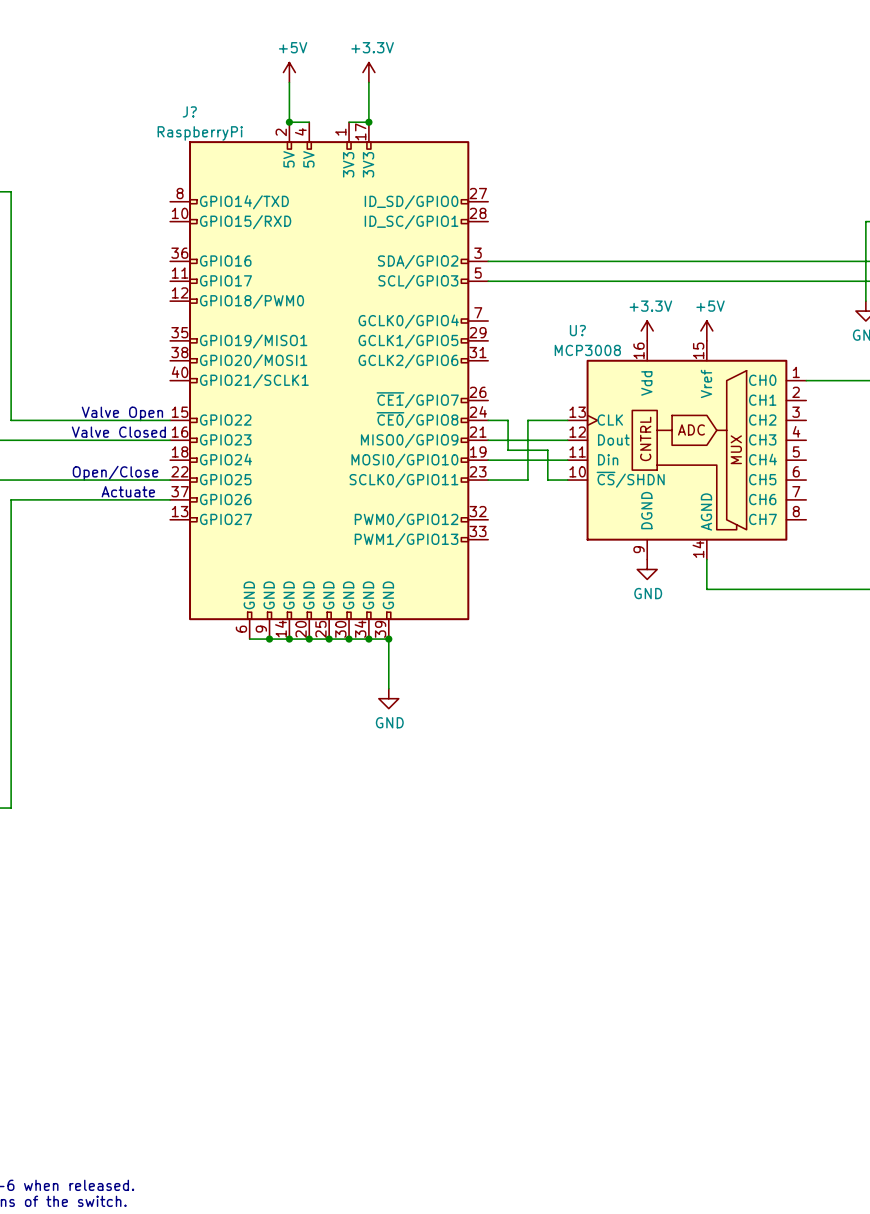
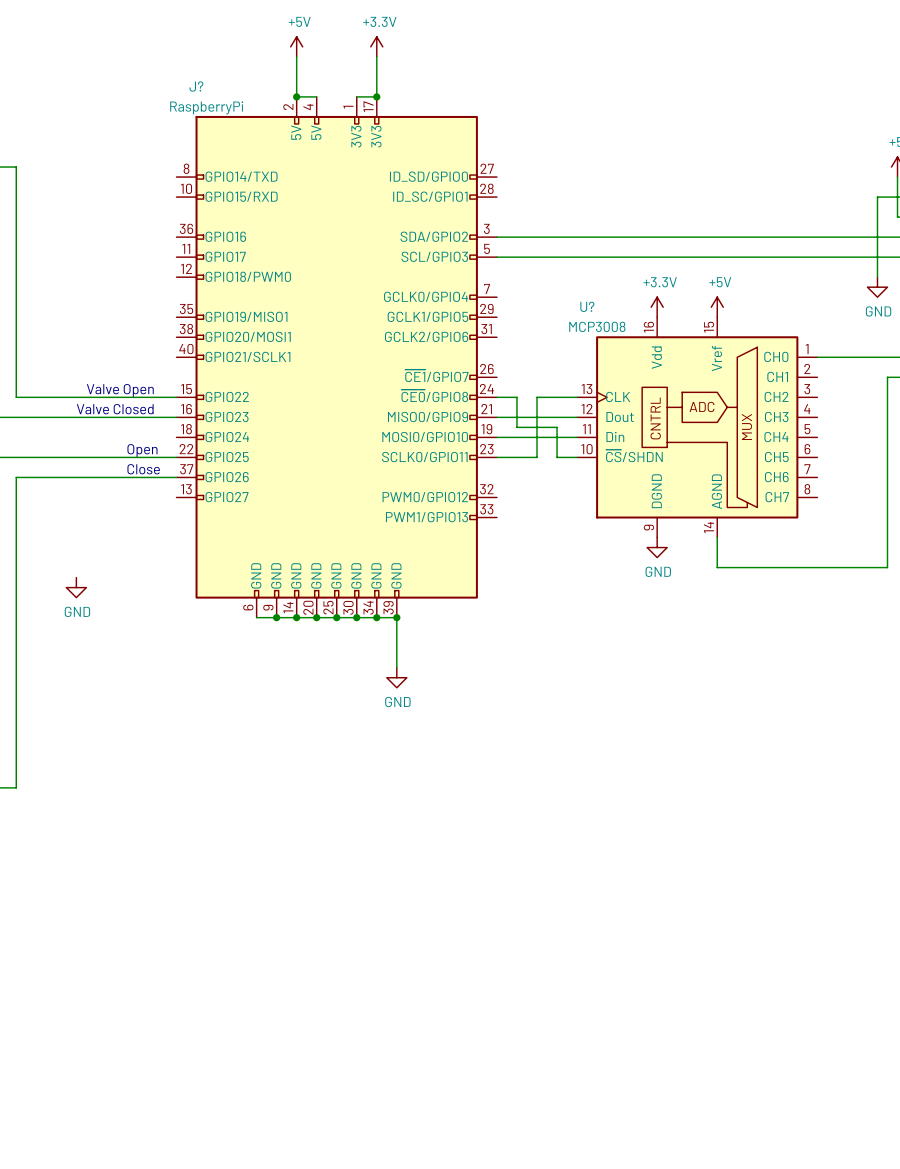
text: Open/Close (115, 473) -> Close (143, 469)
text: none -> Open (142, 450)
text: Actuate (128, 491) -> none
power symbol: none -> GND (76, 587)

